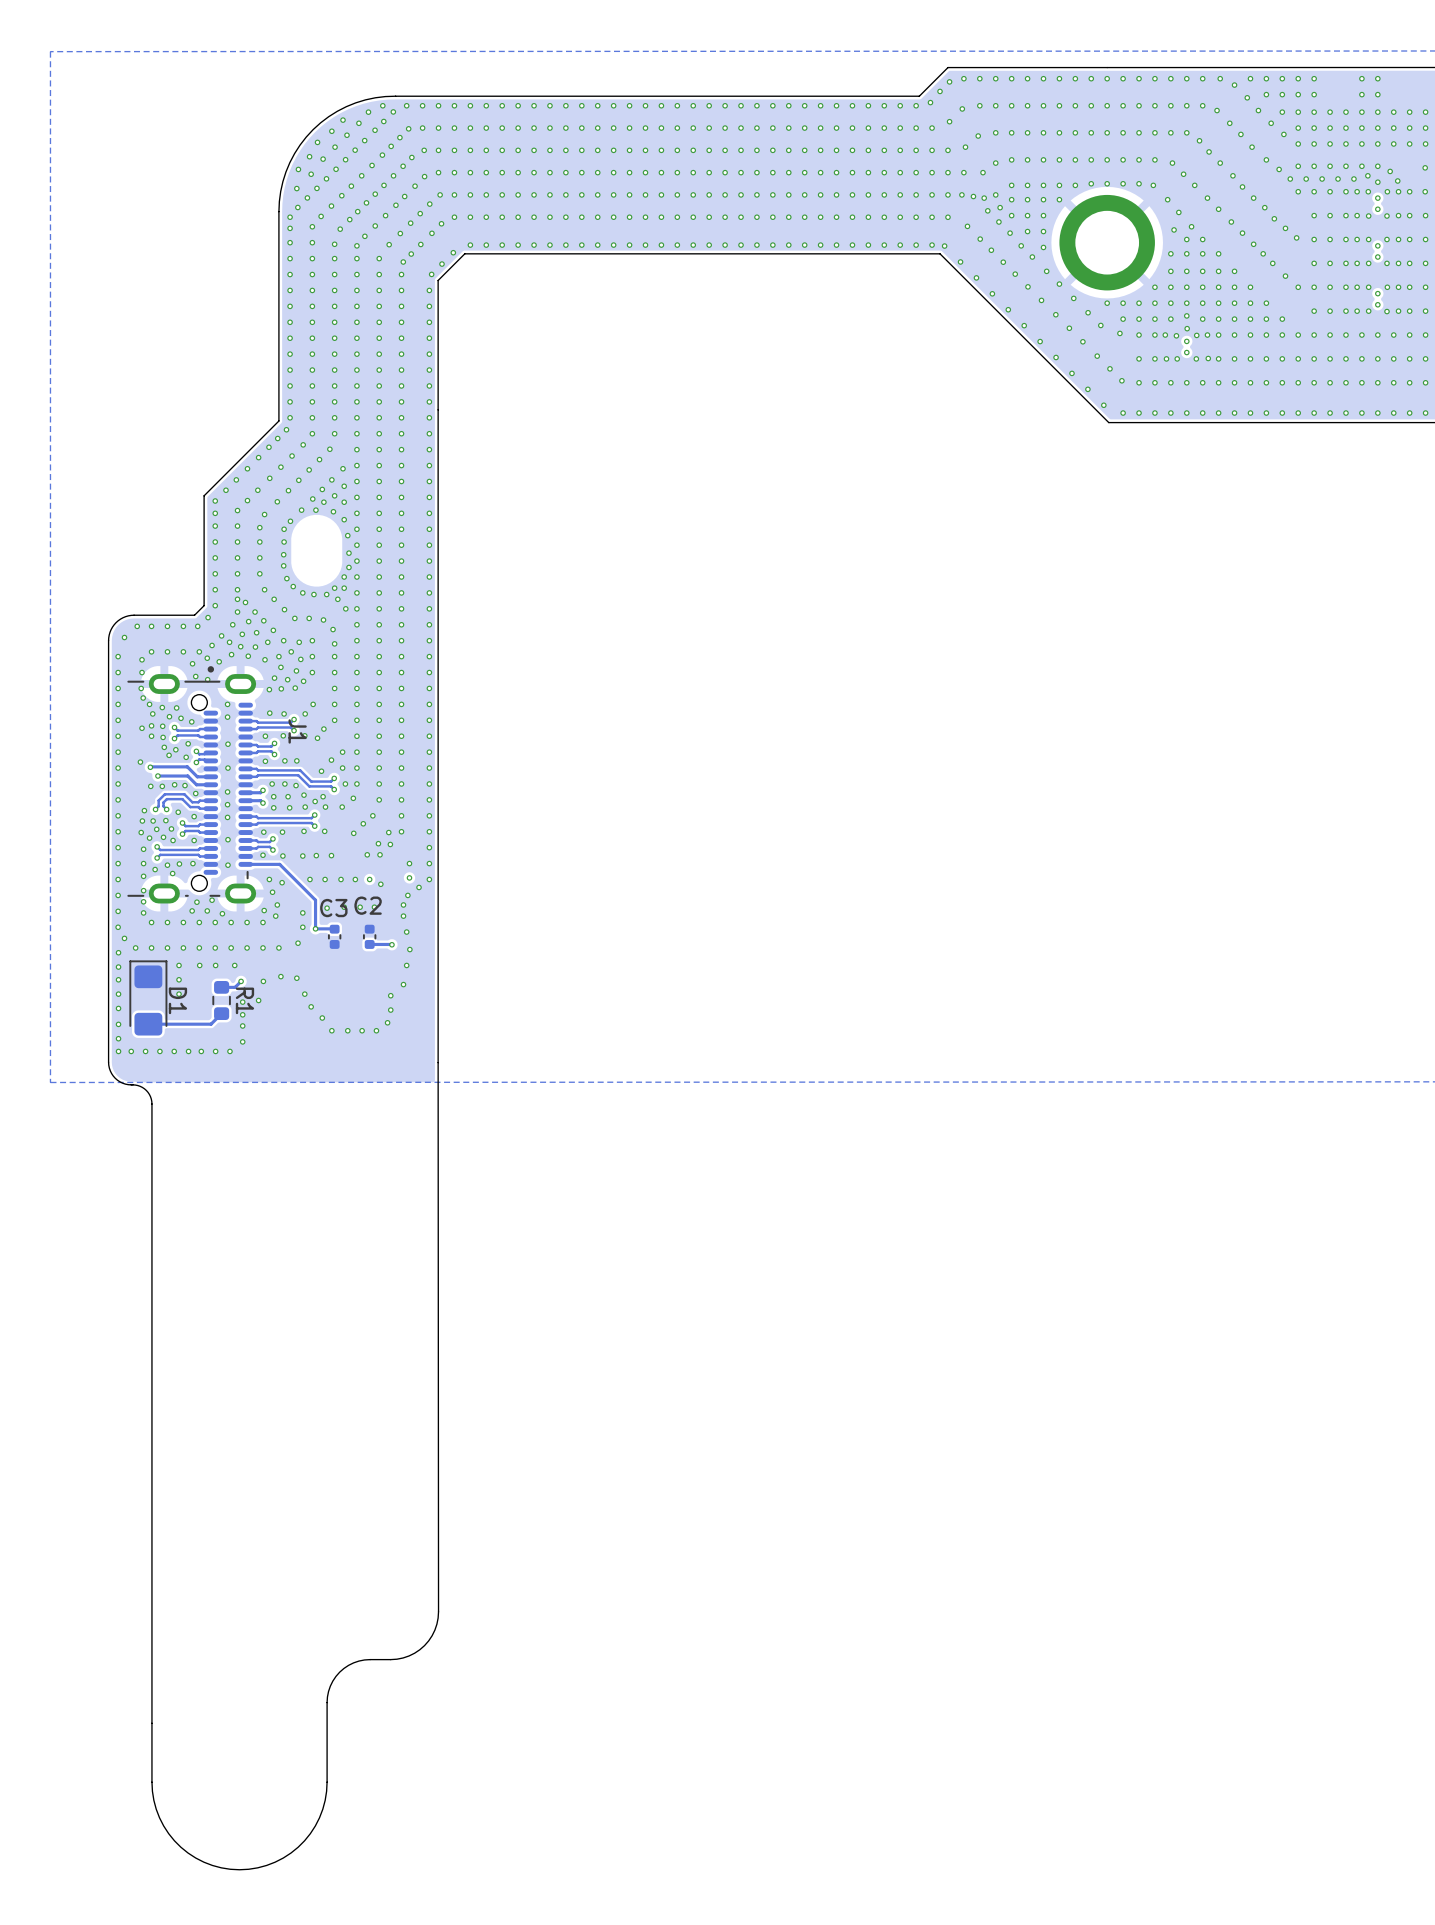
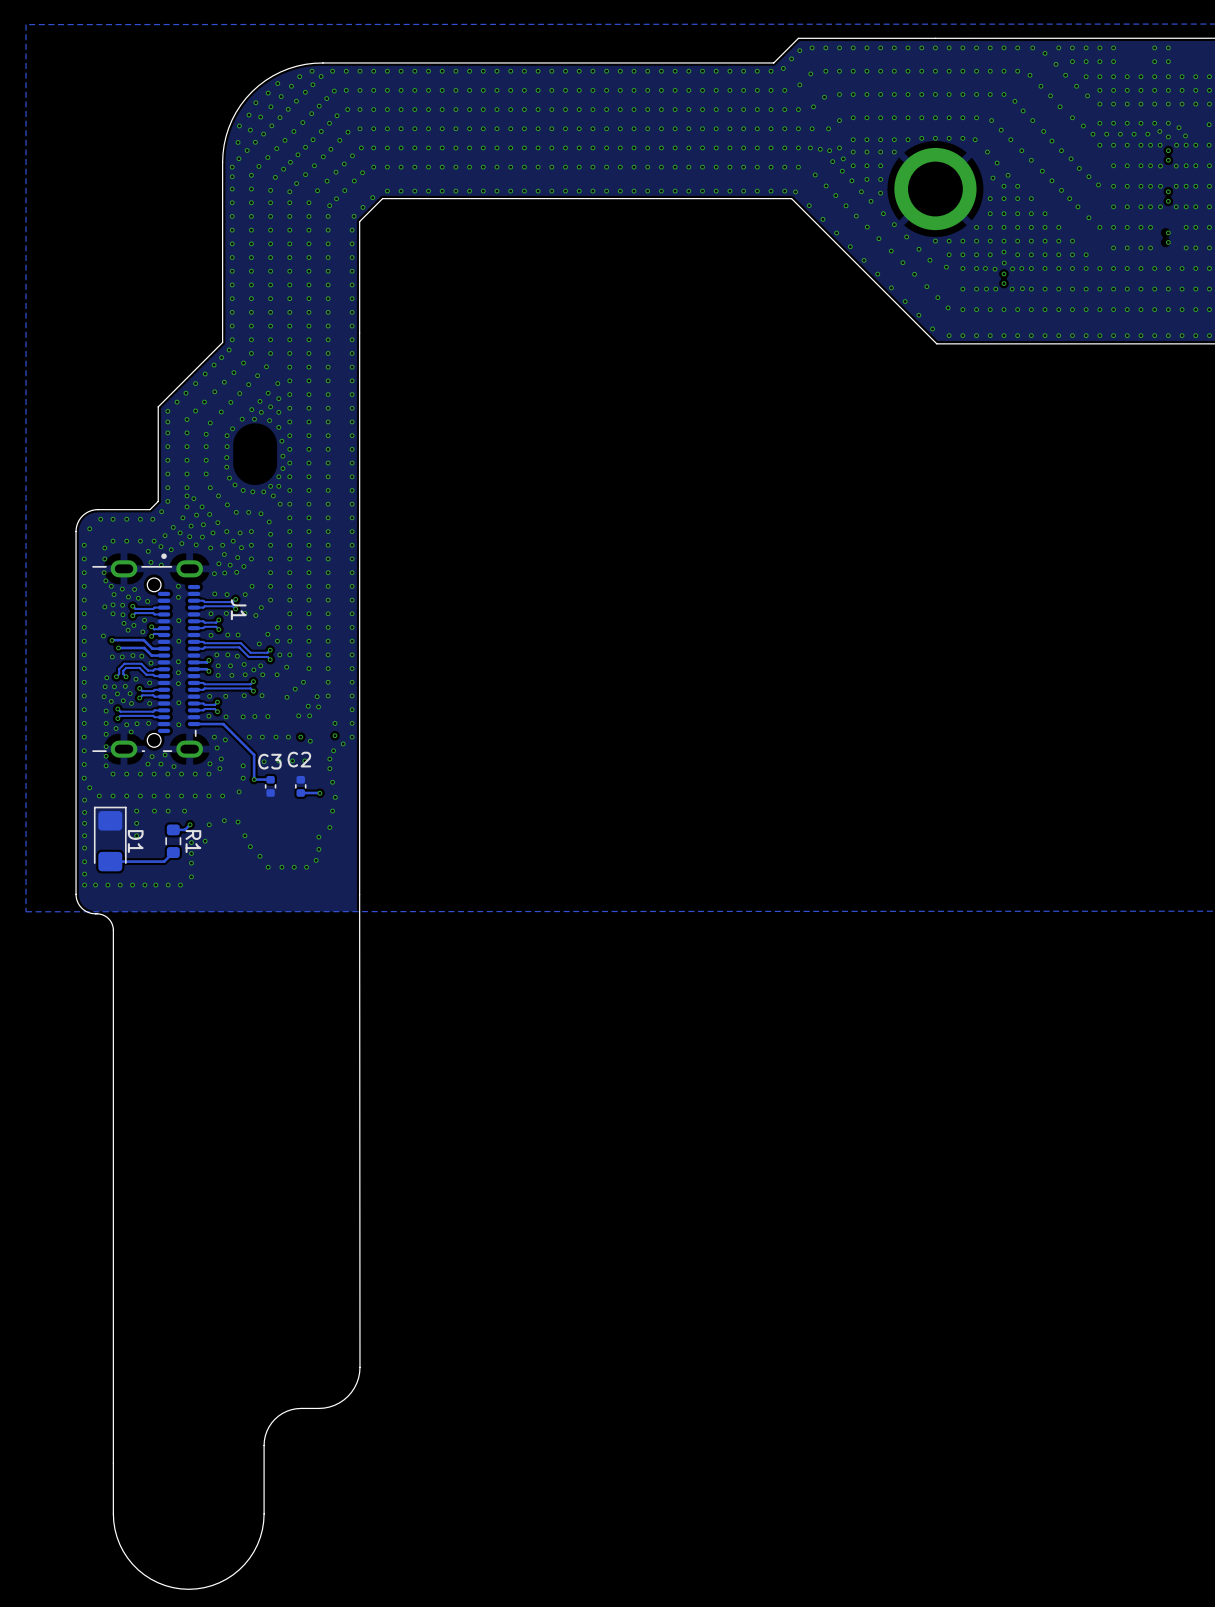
via: (1368, 287) -> none
via: (1387, 287) -> none
via: (1368, 311) -> none
via: (1386, 311) -> none

